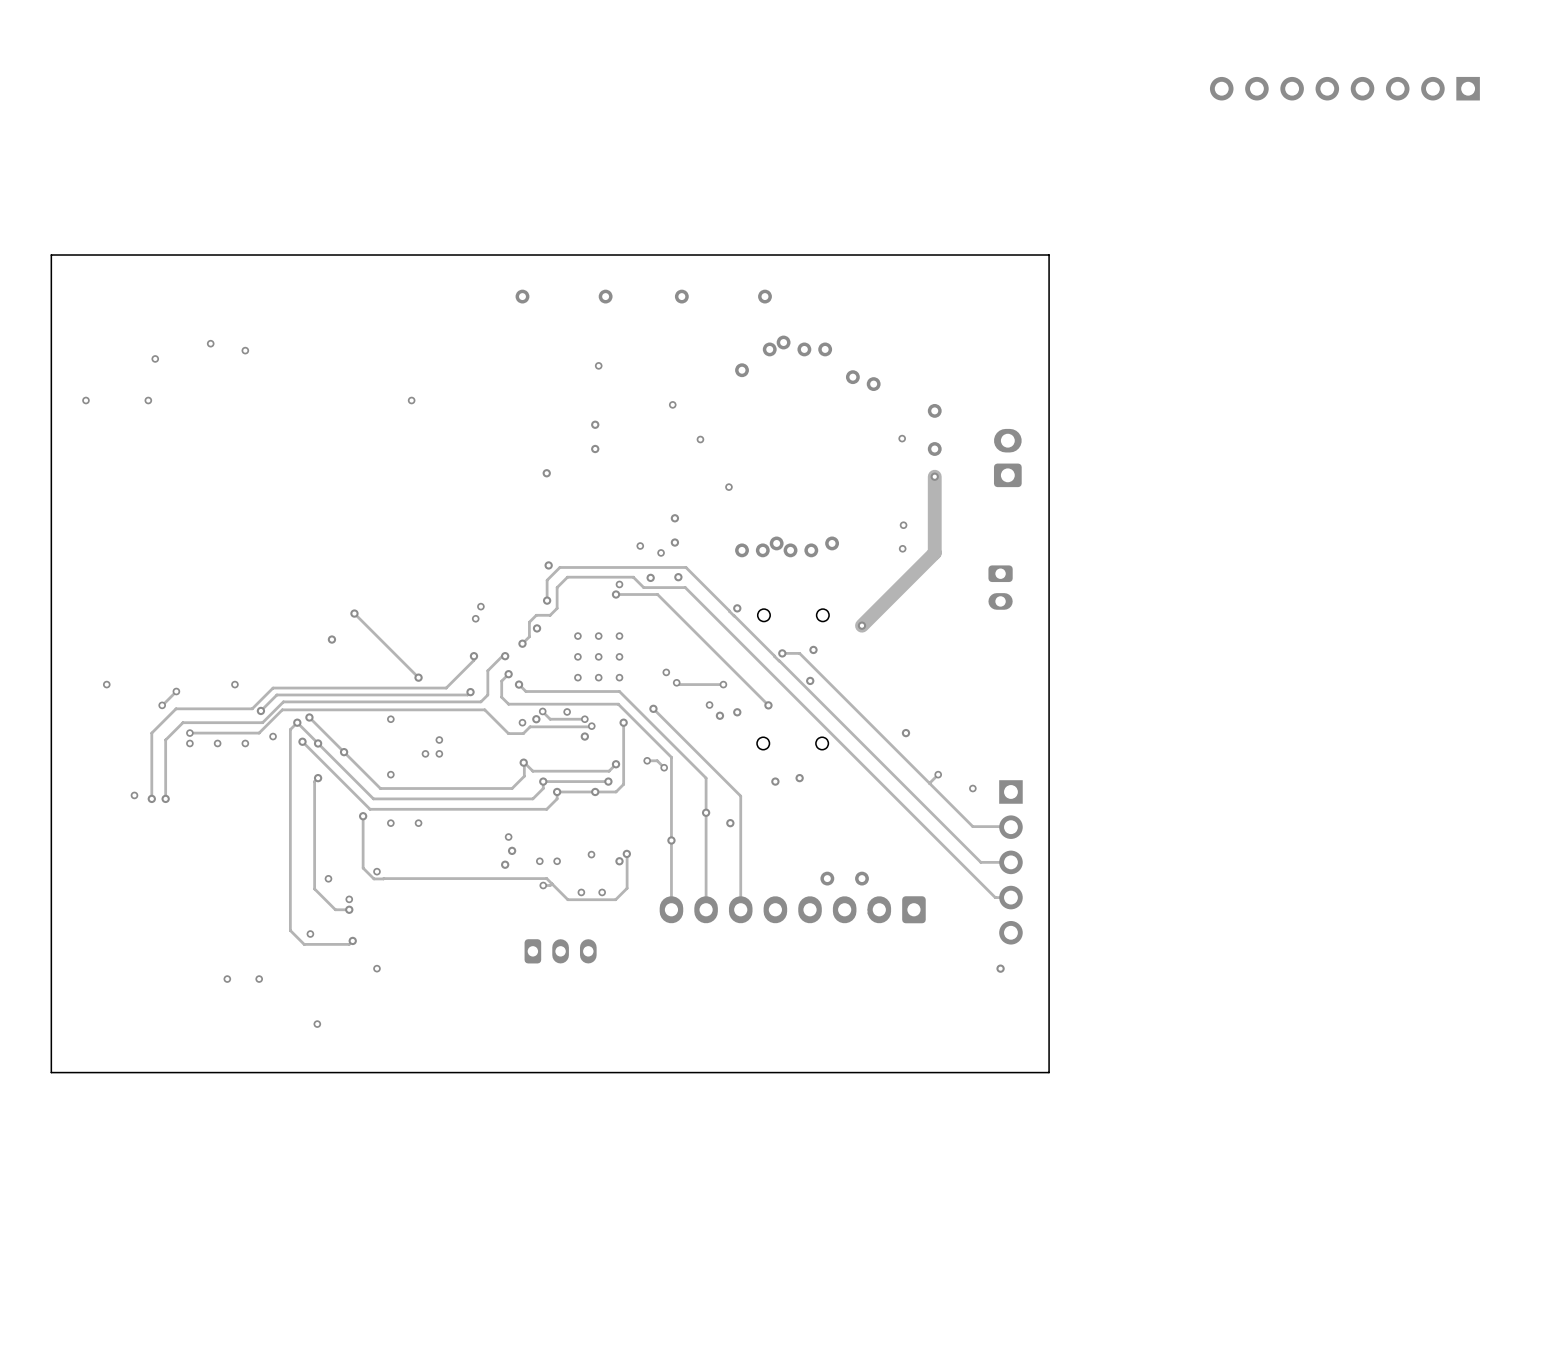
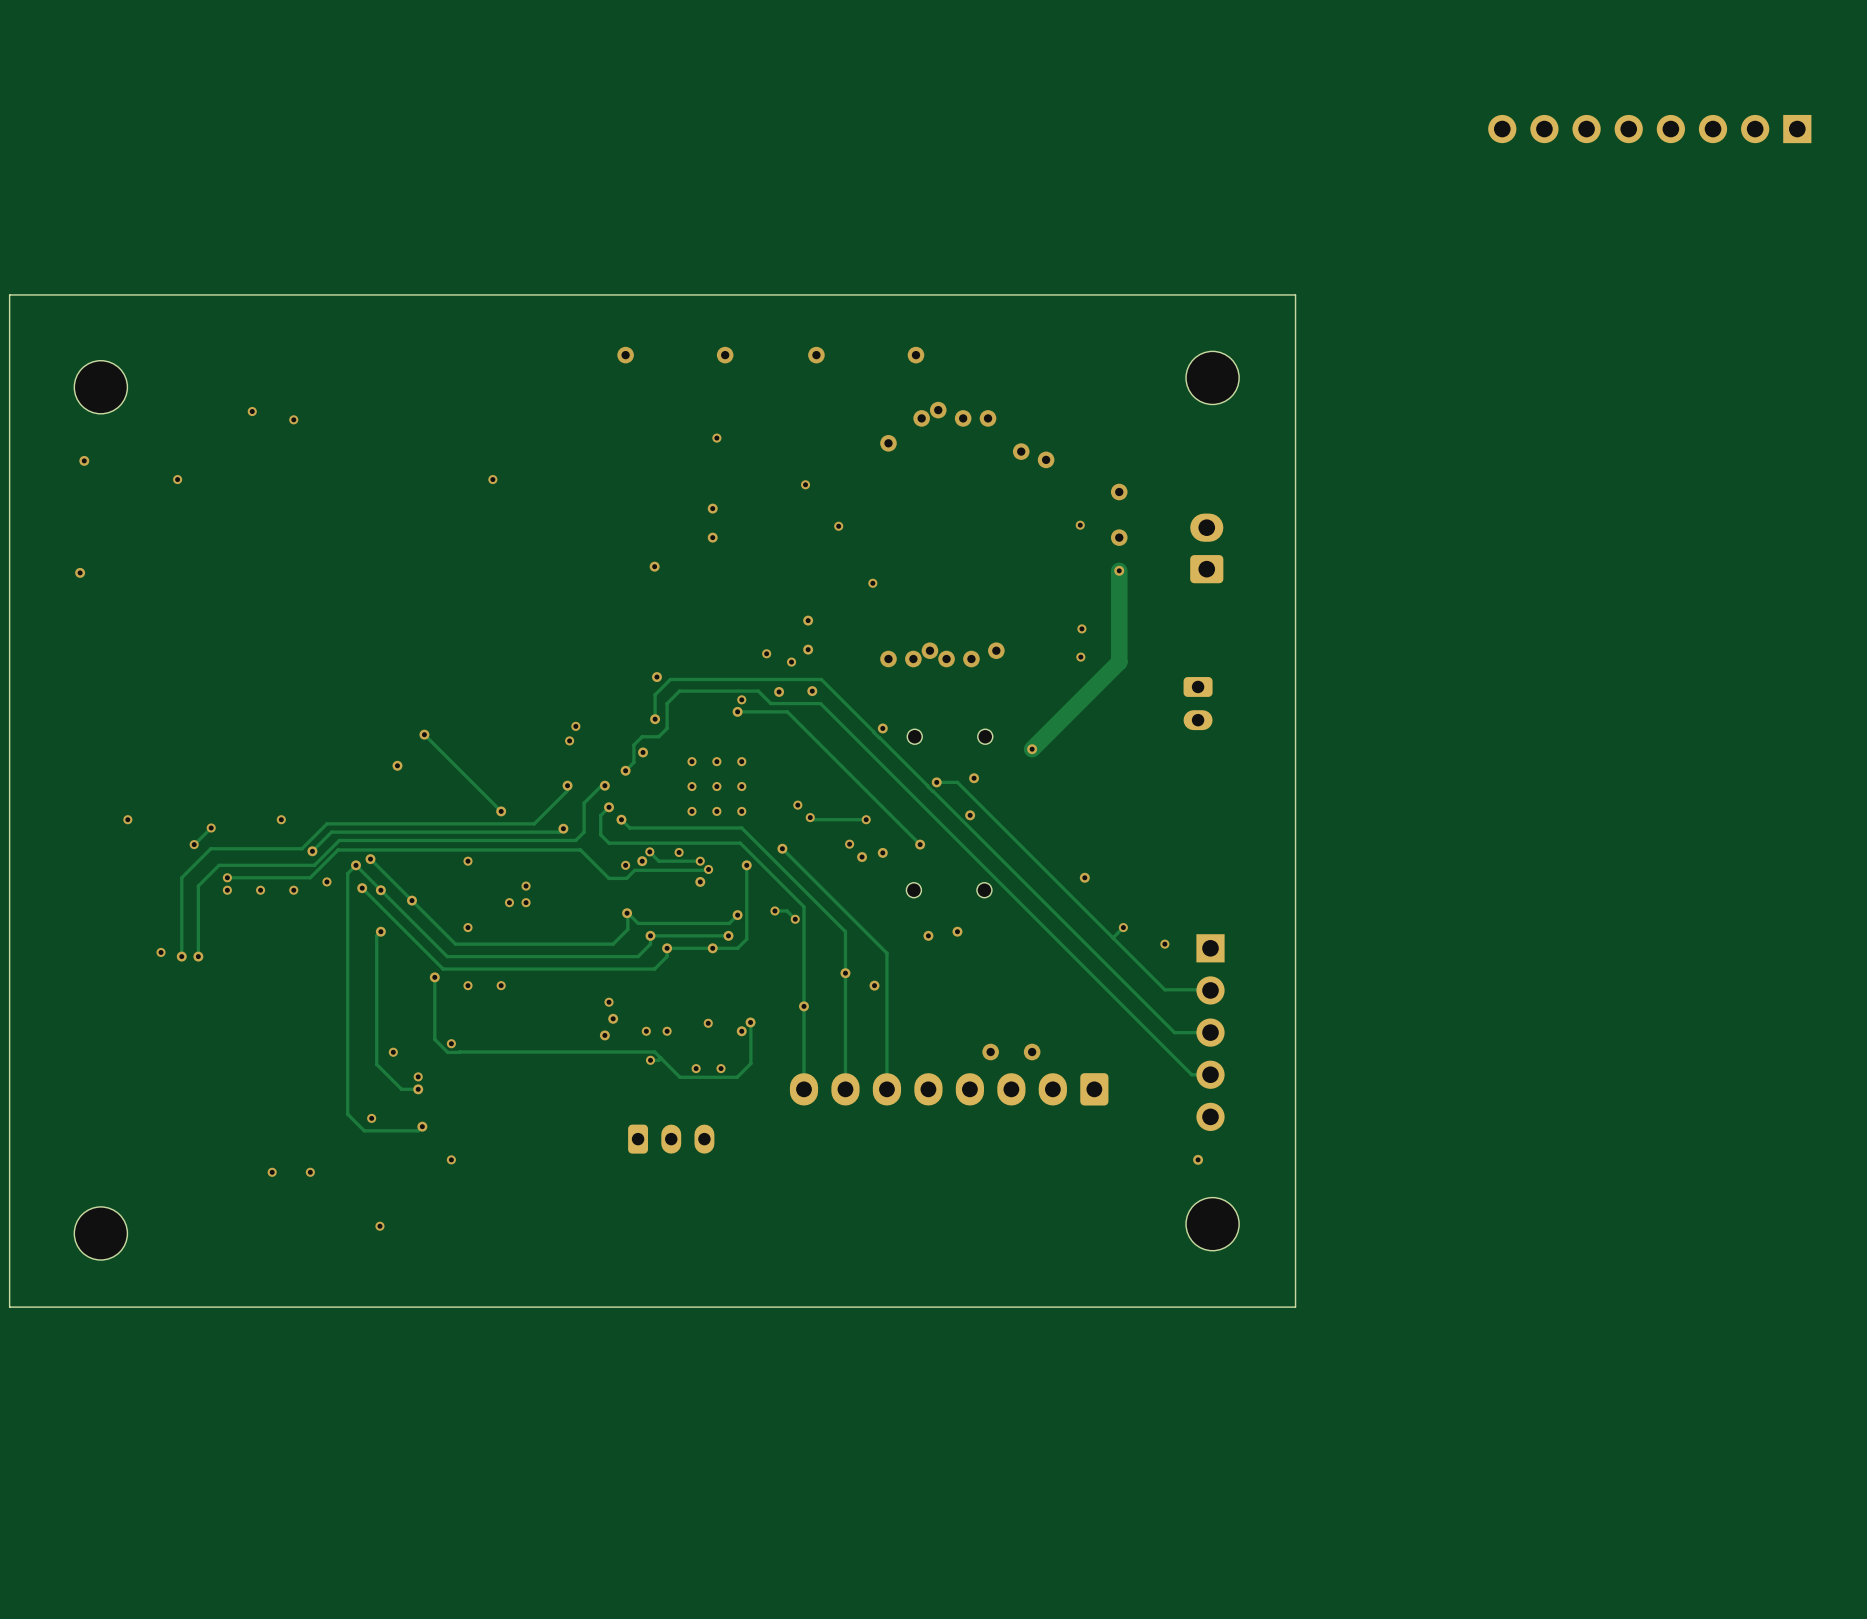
part position: (1344, 88) -> (1649, 129)
board edge: (1049, 255) (51, 255) (51, 1072) (1049, 1072) (1049, 255) -> (1295, 294) (1295, 1307) (9, 1307) (9, 294) (1295, 294)
part: none -> (1212, 377)
part: none -> (100, 387)
via: (155, 358) -> none
via: none -> (84, 460)
via: (85, 400) -> none
via: none -> (80, 572)
part: none -> (1212, 1224)
part: none -> (100, 1233)

